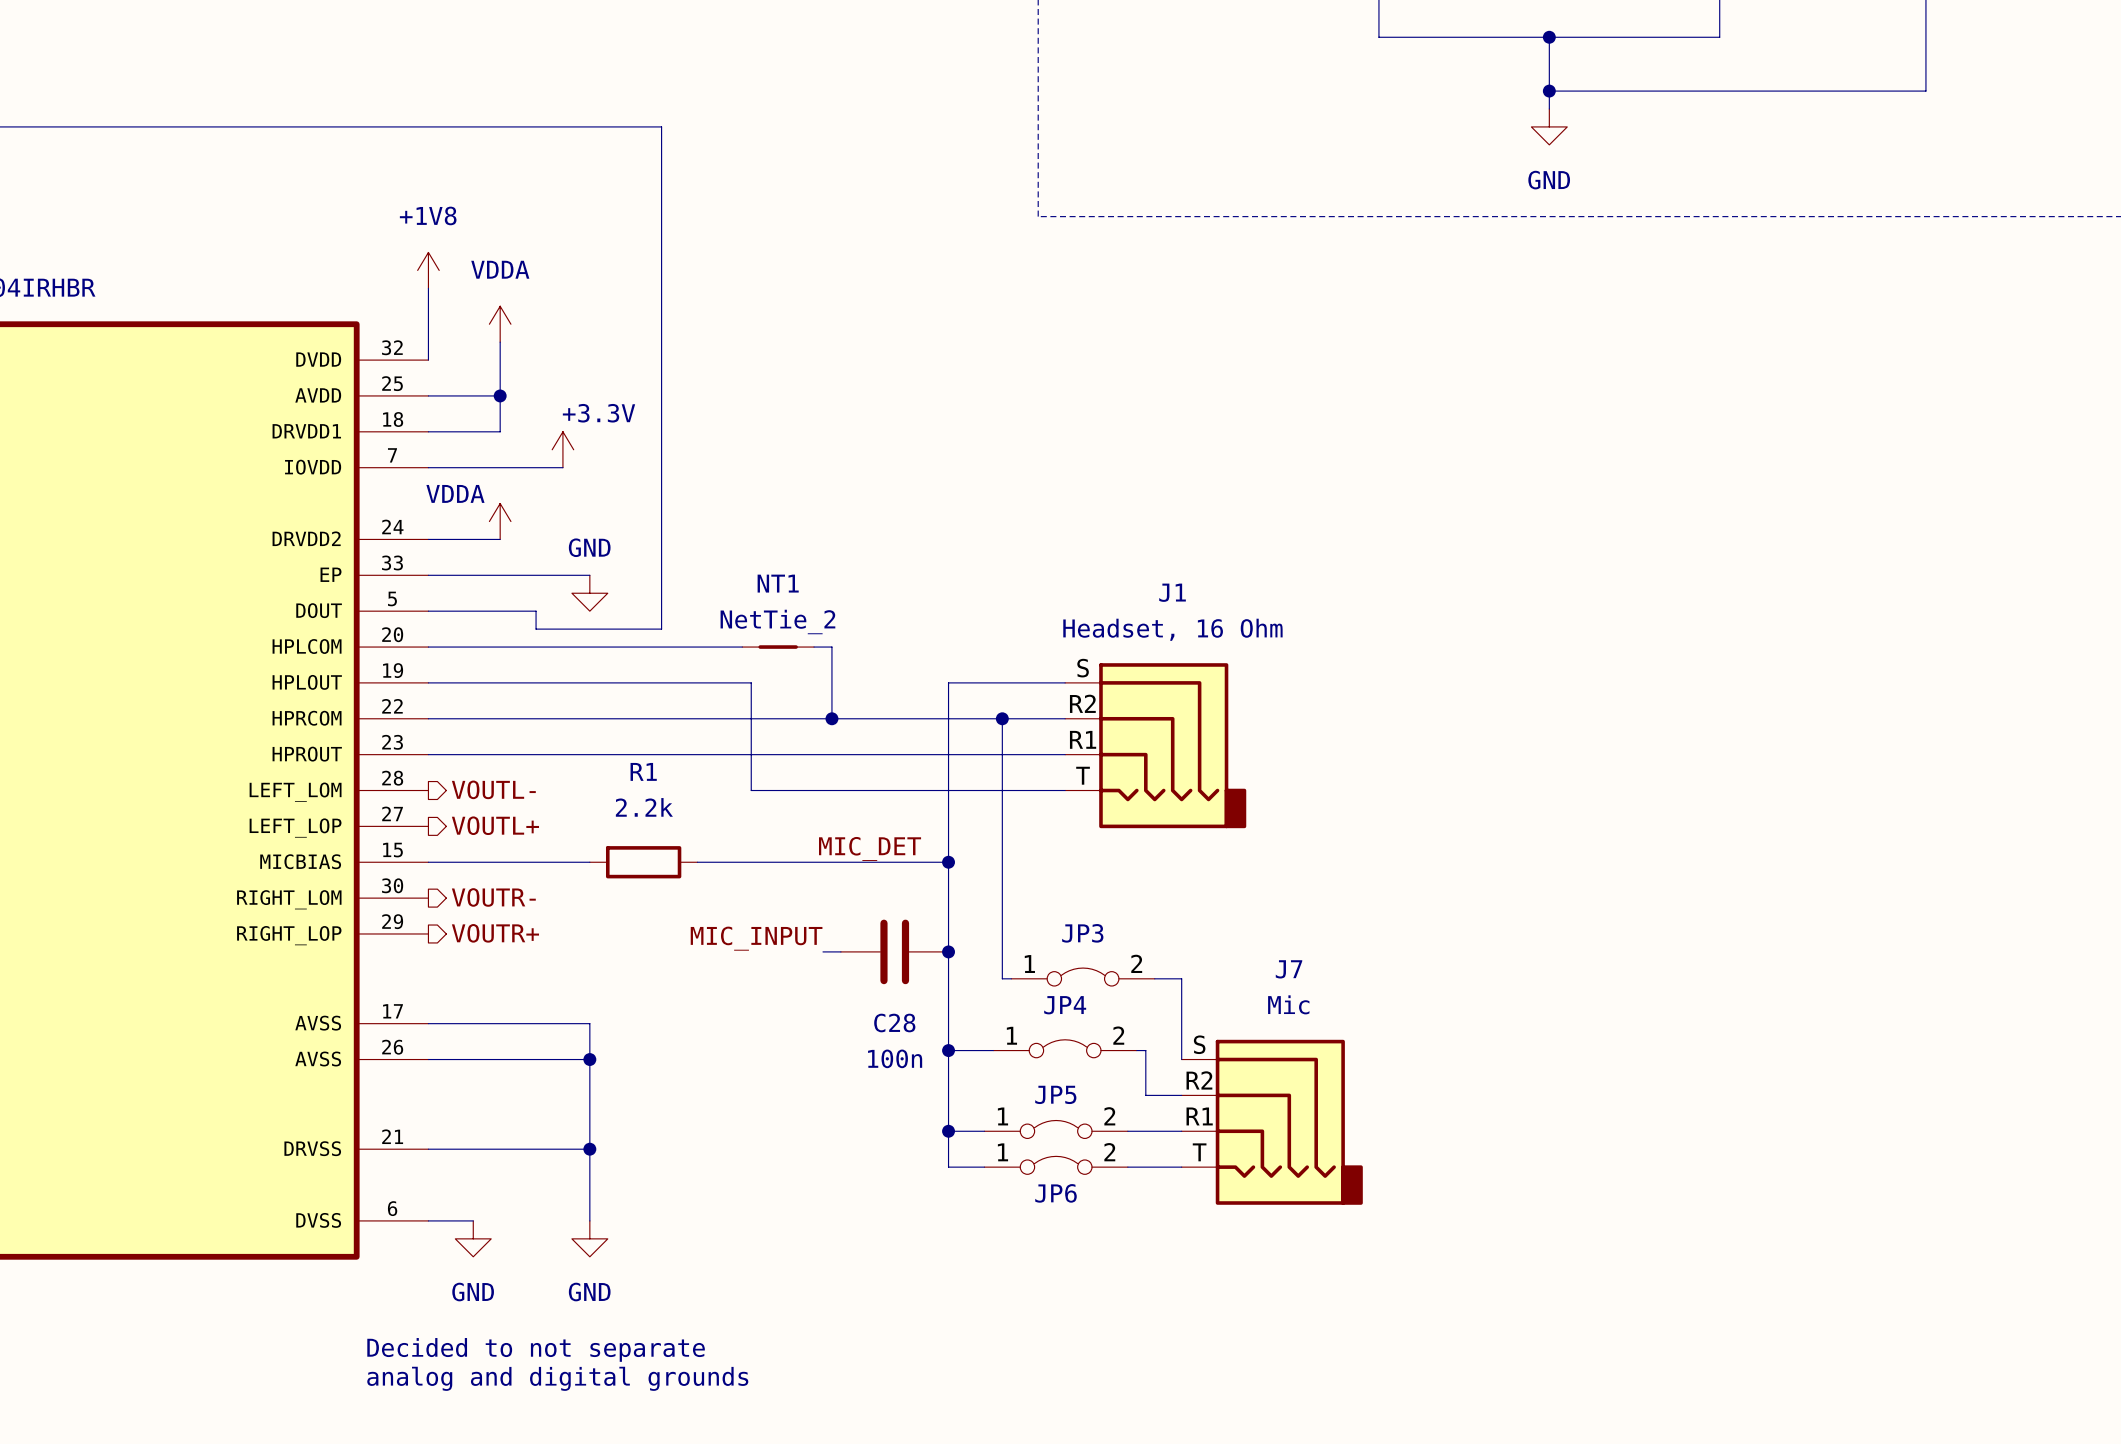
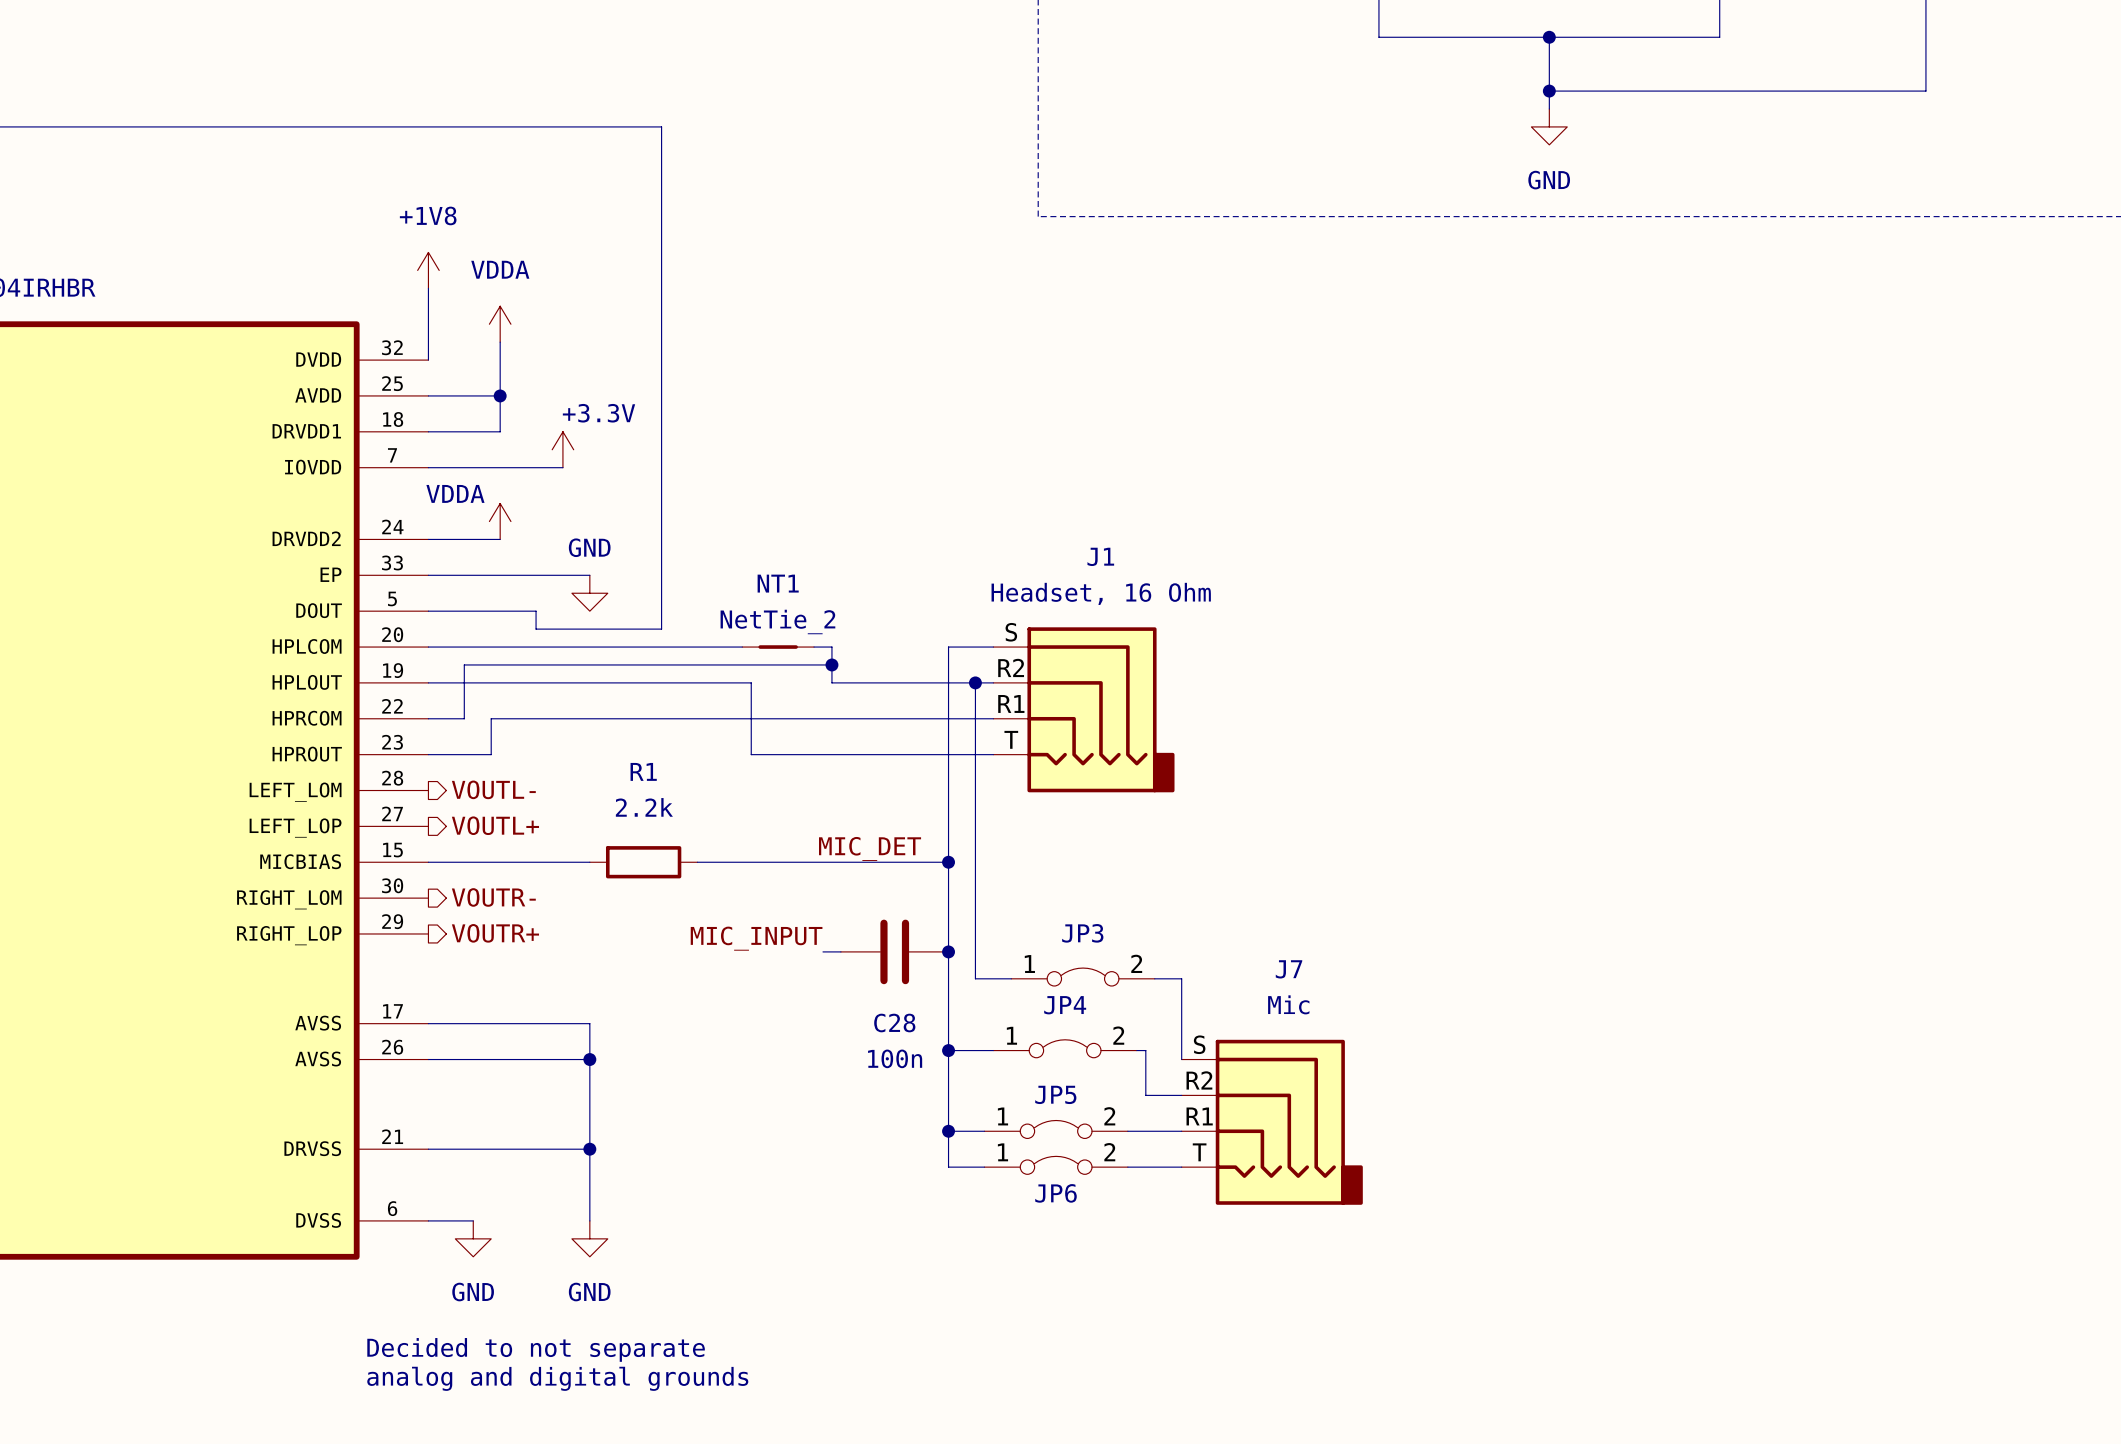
wire: none -> (831, 664) (464, 664) (464, 718)
wire: (831, 682) (831, 718) -> (831, 682) (948, 682) (948, 647) (993, 647)
wire: (464, 718) (491, 718) -> (491, 754) (491, 718)
junction position: (831, 718) -> (831, 664)
wire: (1002, 718) (1002, 978) -> (975, 682) (975, 978) (1002, 978)
junction position: (1002, 718) -> (975, 682)
J1 position: (1155, 745) -> (1083, 709)
wire: (491, 754) (751, 754) (751, 790) (1065, 790) -> none

